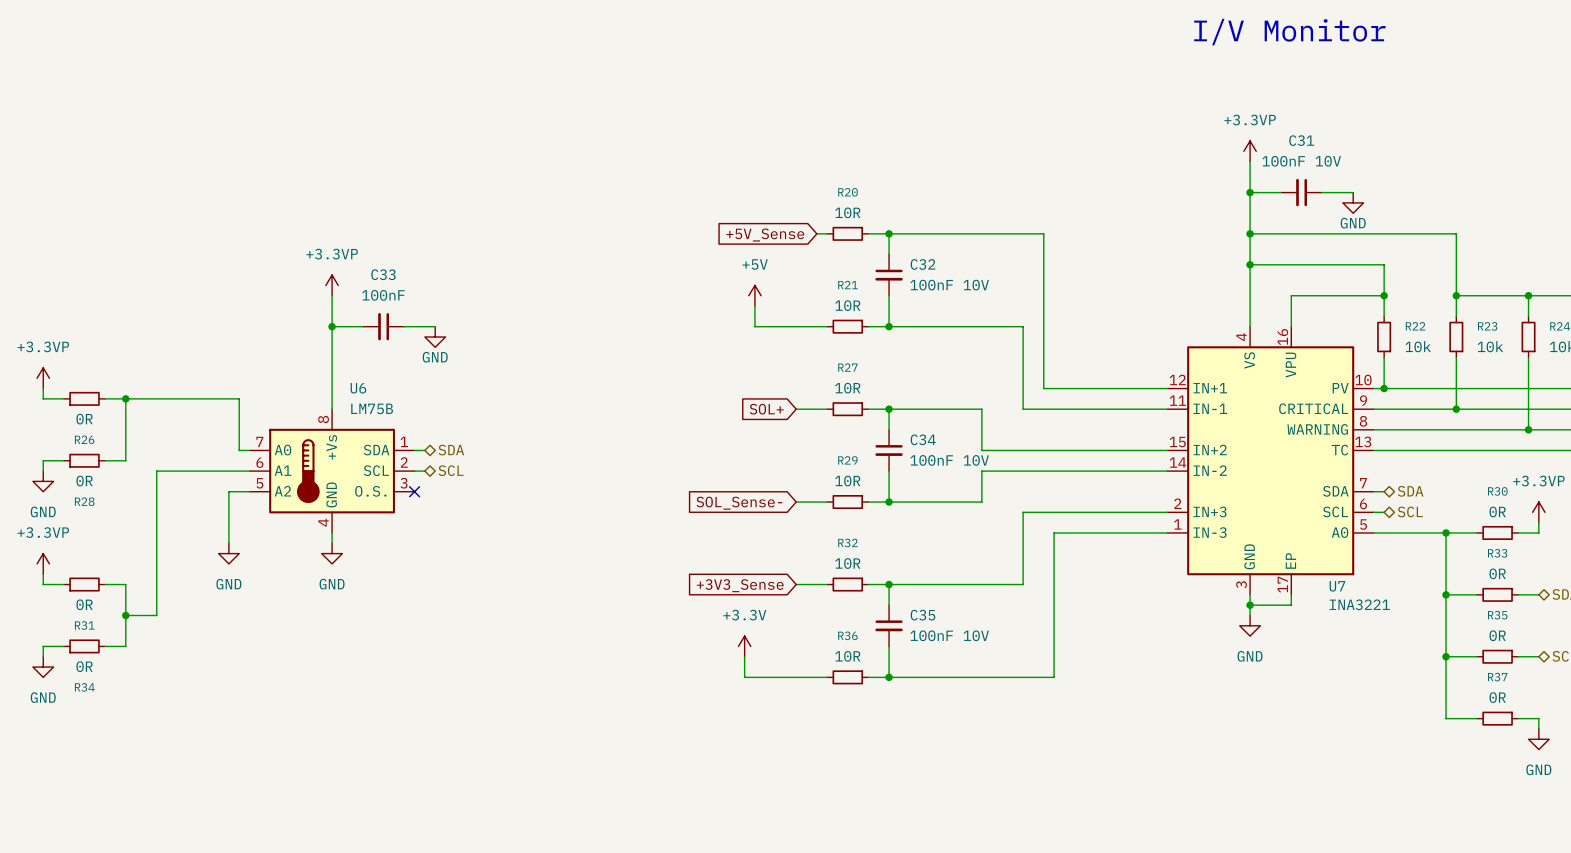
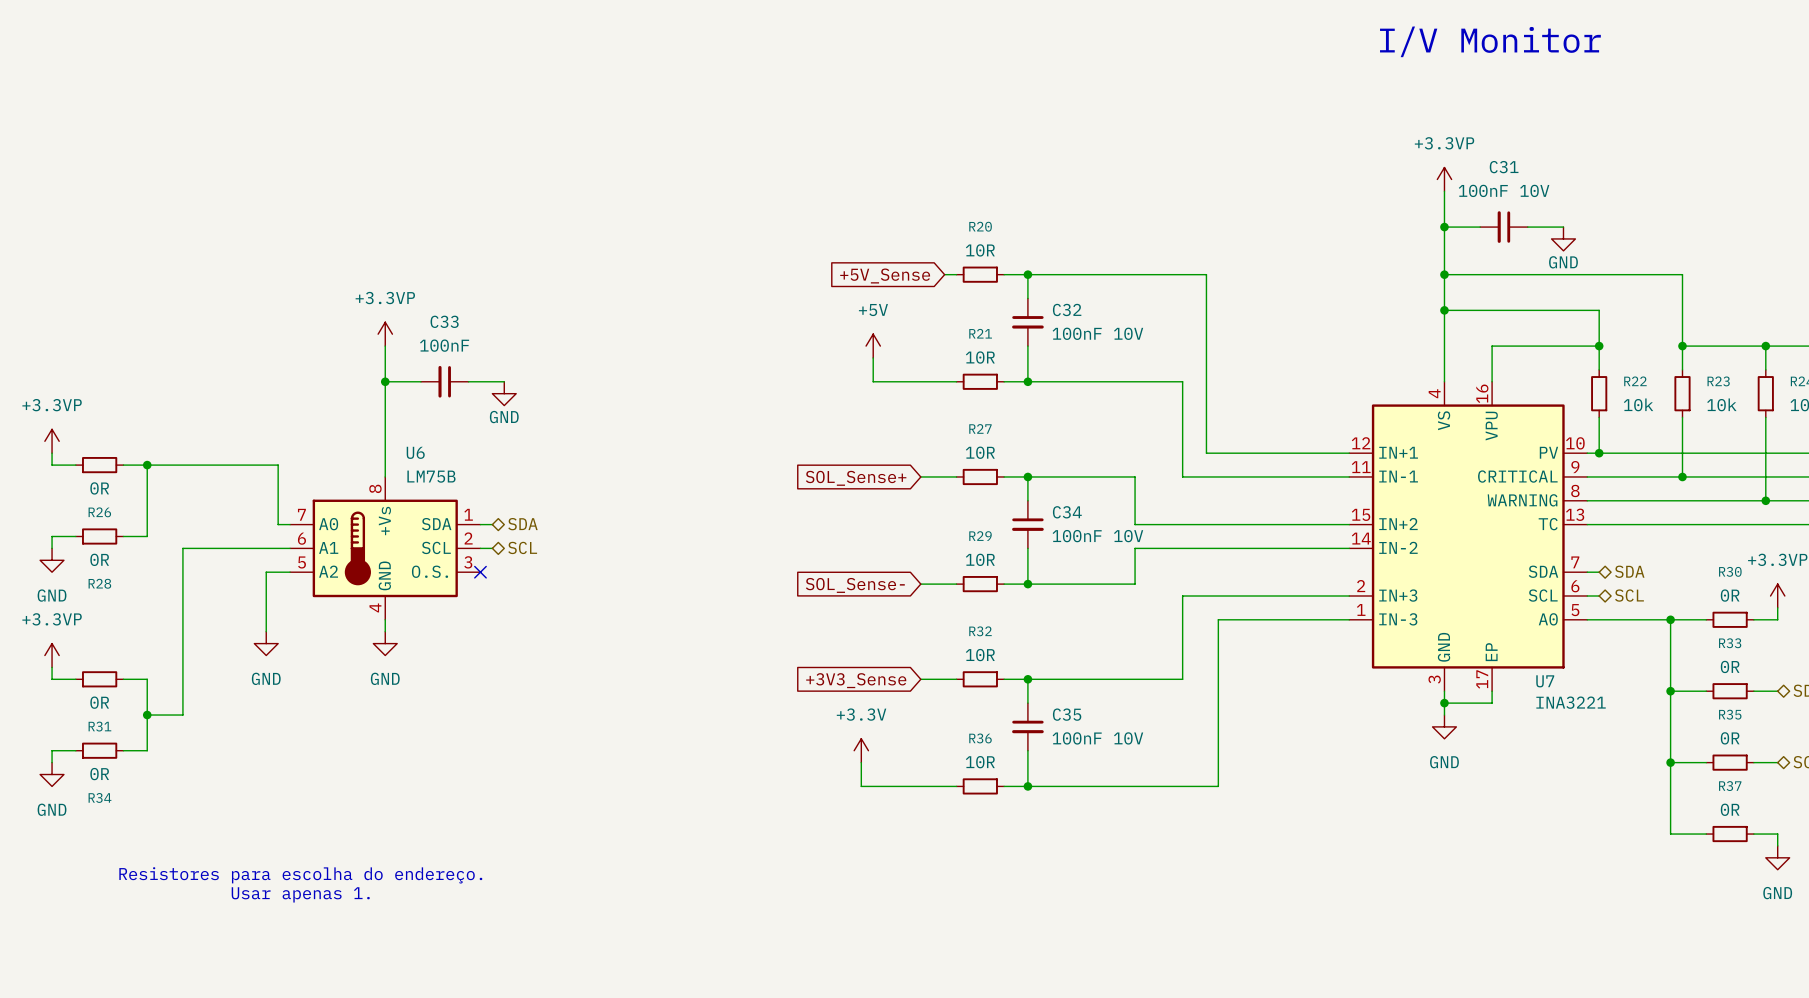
global label: SOL+ (766, 409) -> SOL_Sense+ (856, 478)
text: none -> Resistores para escolha do endereço. (300, 875)
text: none -> Usar apenas 1. (300, 894)

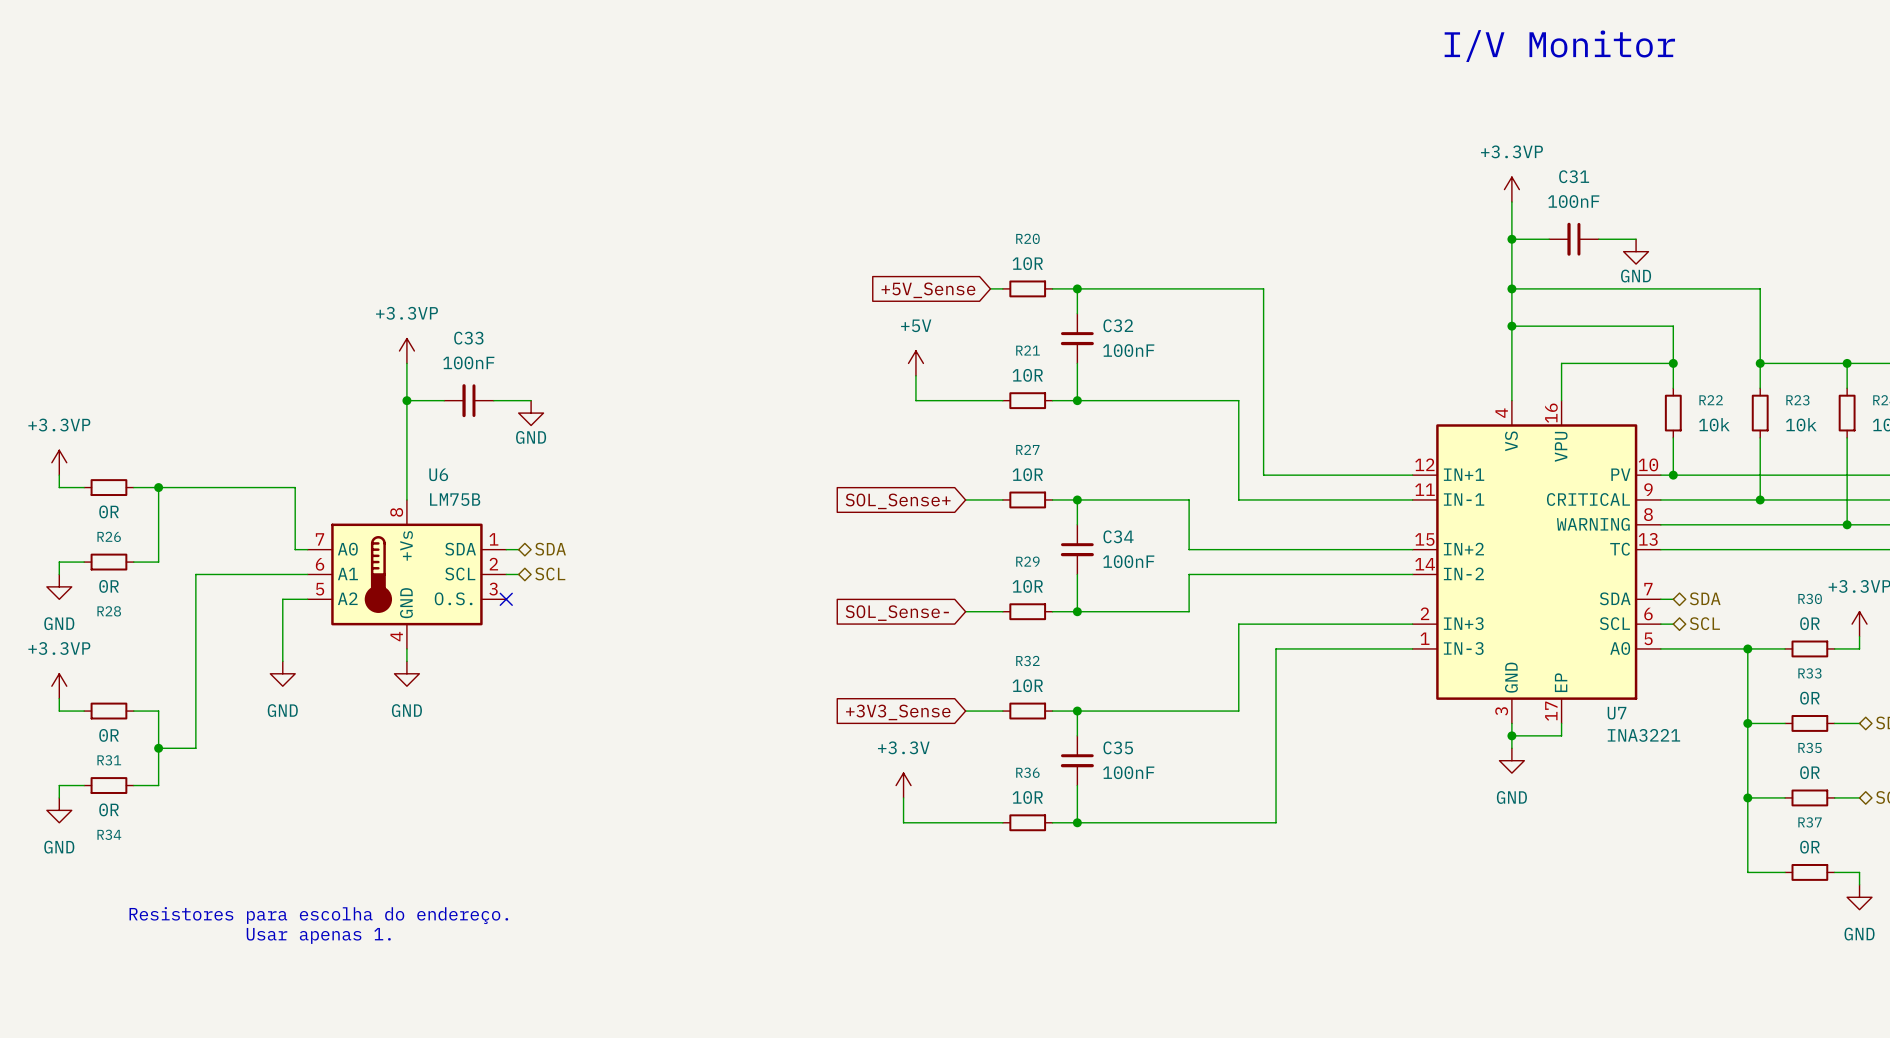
C31 value: 100nF 10V (1504, 190) -> 100nF (1573, 201)
C32 value: 100nF 10V (1097, 333) -> 100nF (1128, 350)
C34 value: 100nF 10V (1097, 536) -> 100nF (1128, 561)
C35 value: 100nF 10V (1097, 738) -> 100nF (1128, 772)

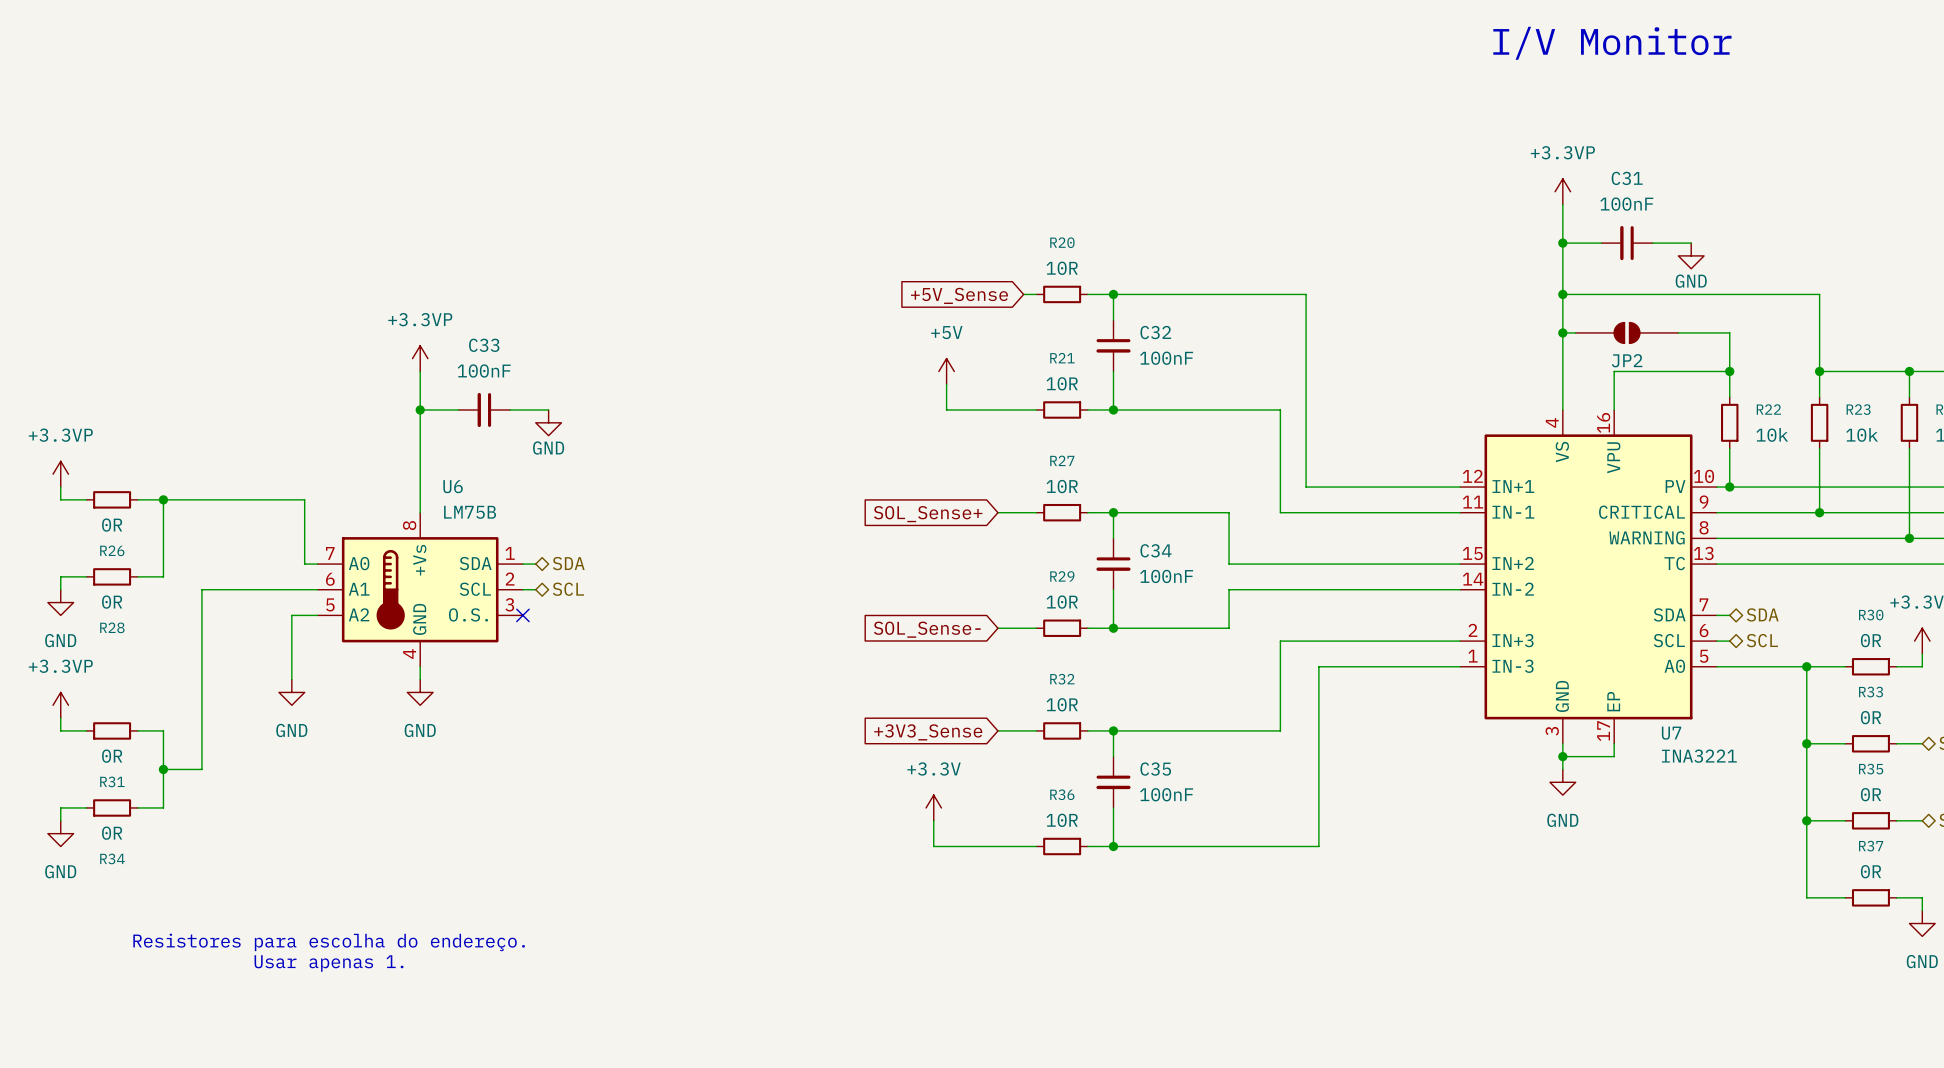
JP2: none -> (1627, 332)

